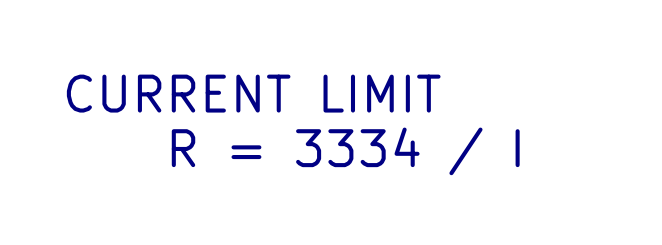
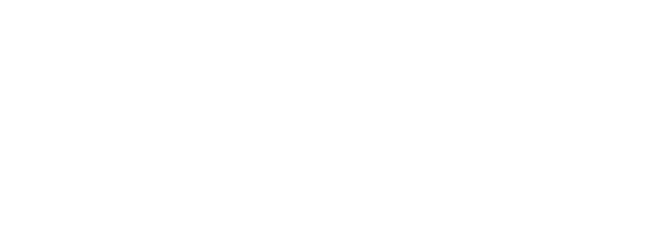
text: CURRENT LIMIT (253, 93) -> none
text: R = 3334 / I (345, 151) -> none

